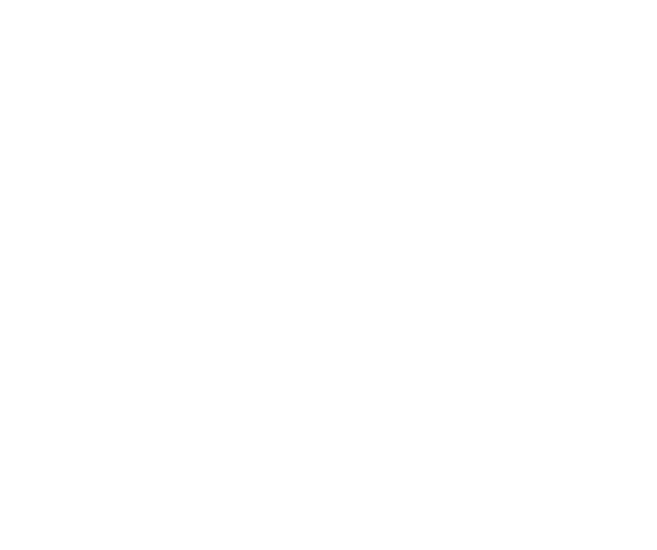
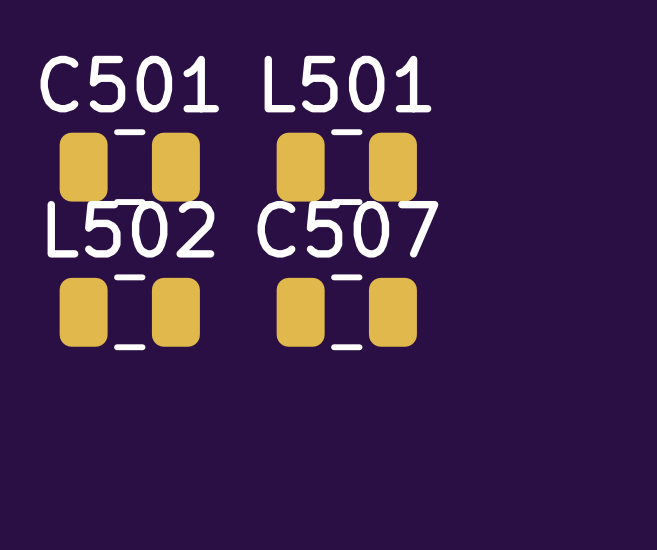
C501: none -> (129, 167)
L501: none -> (346, 167)
L502: none -> (129, 312)
C507: none -> (346, 312)

